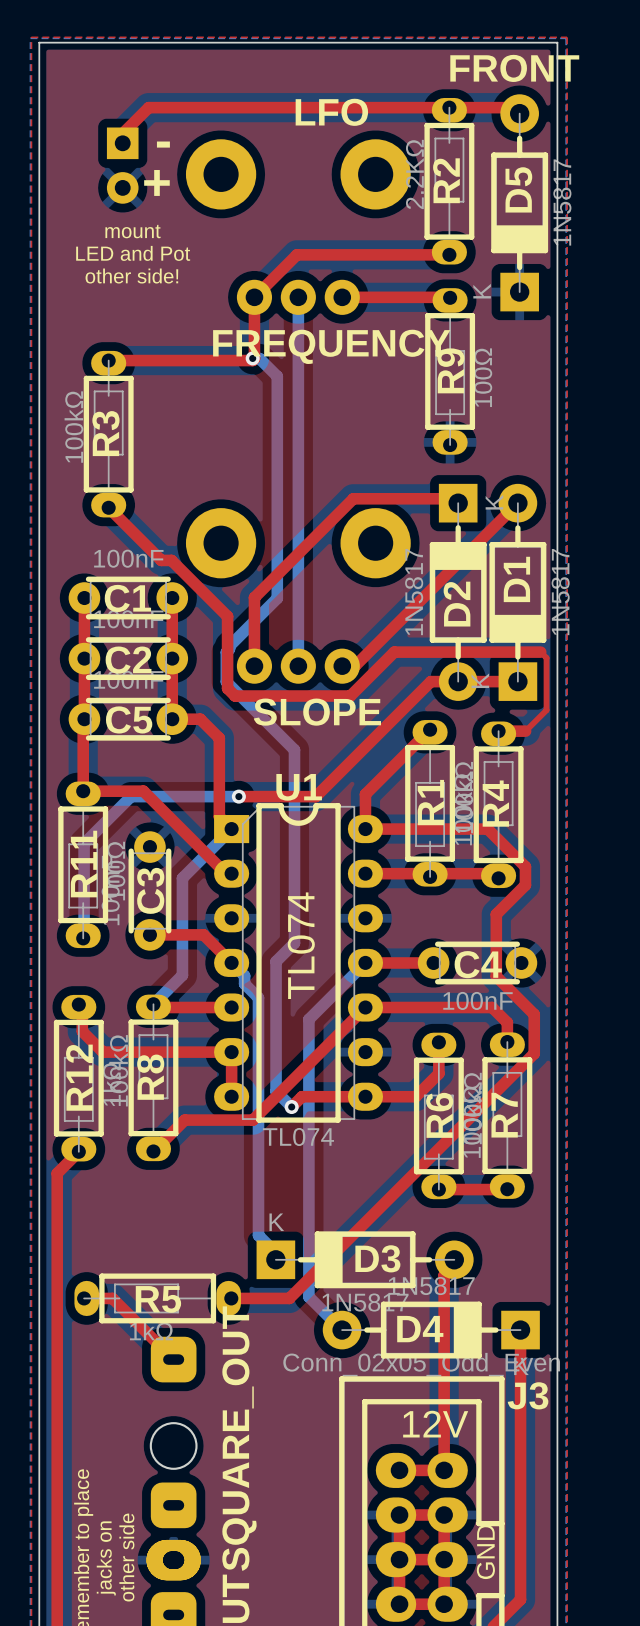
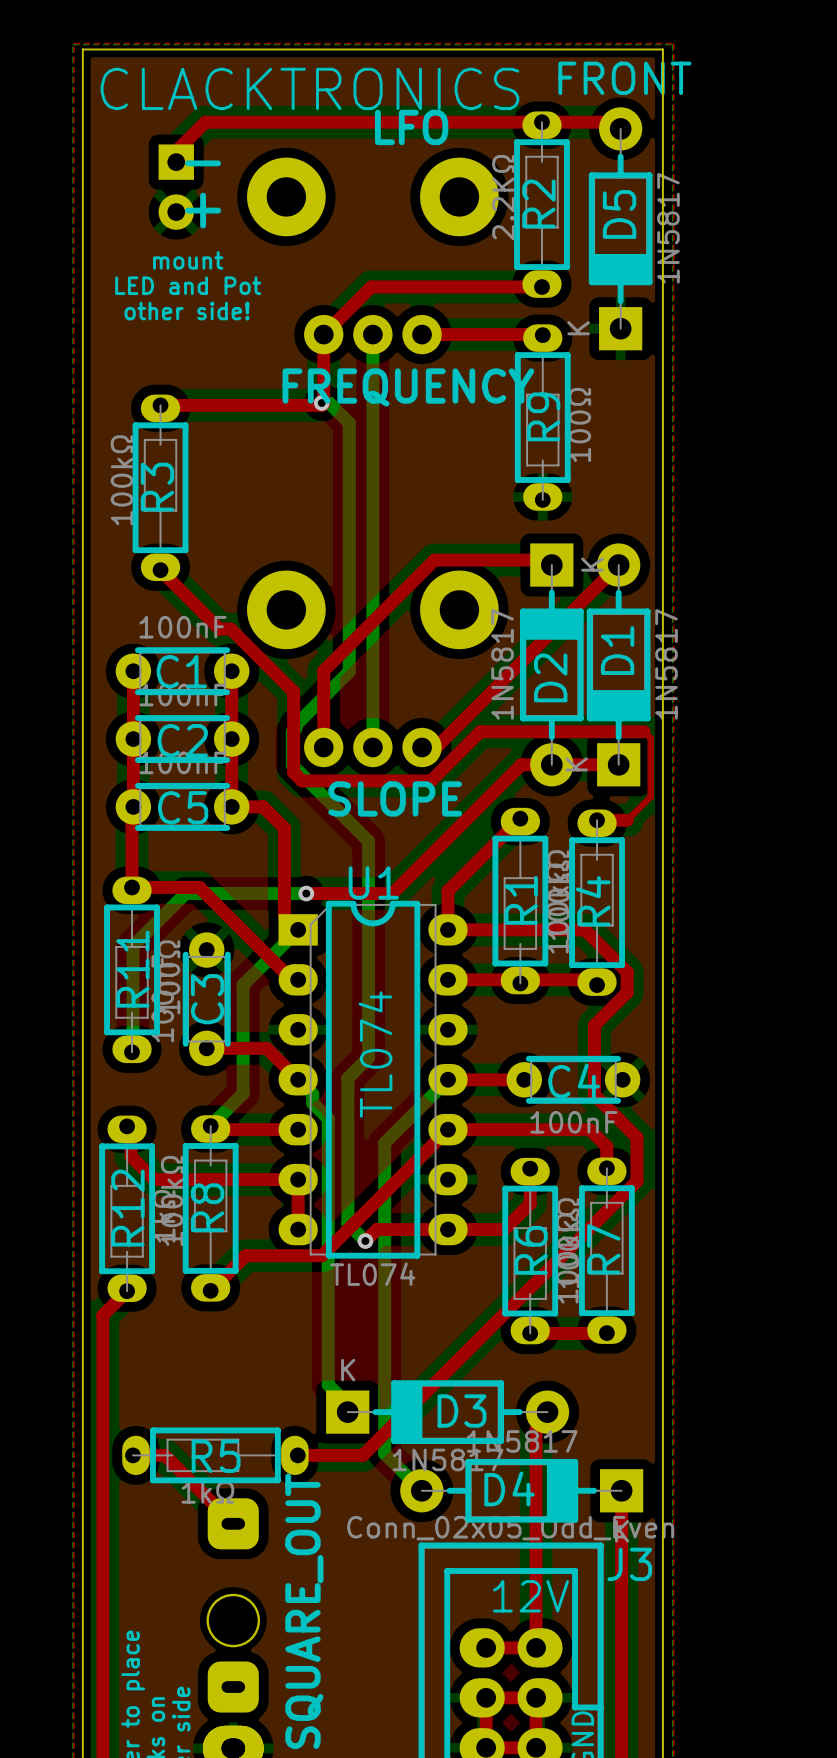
text: none -> CLACKTRONICS (309, 88)

